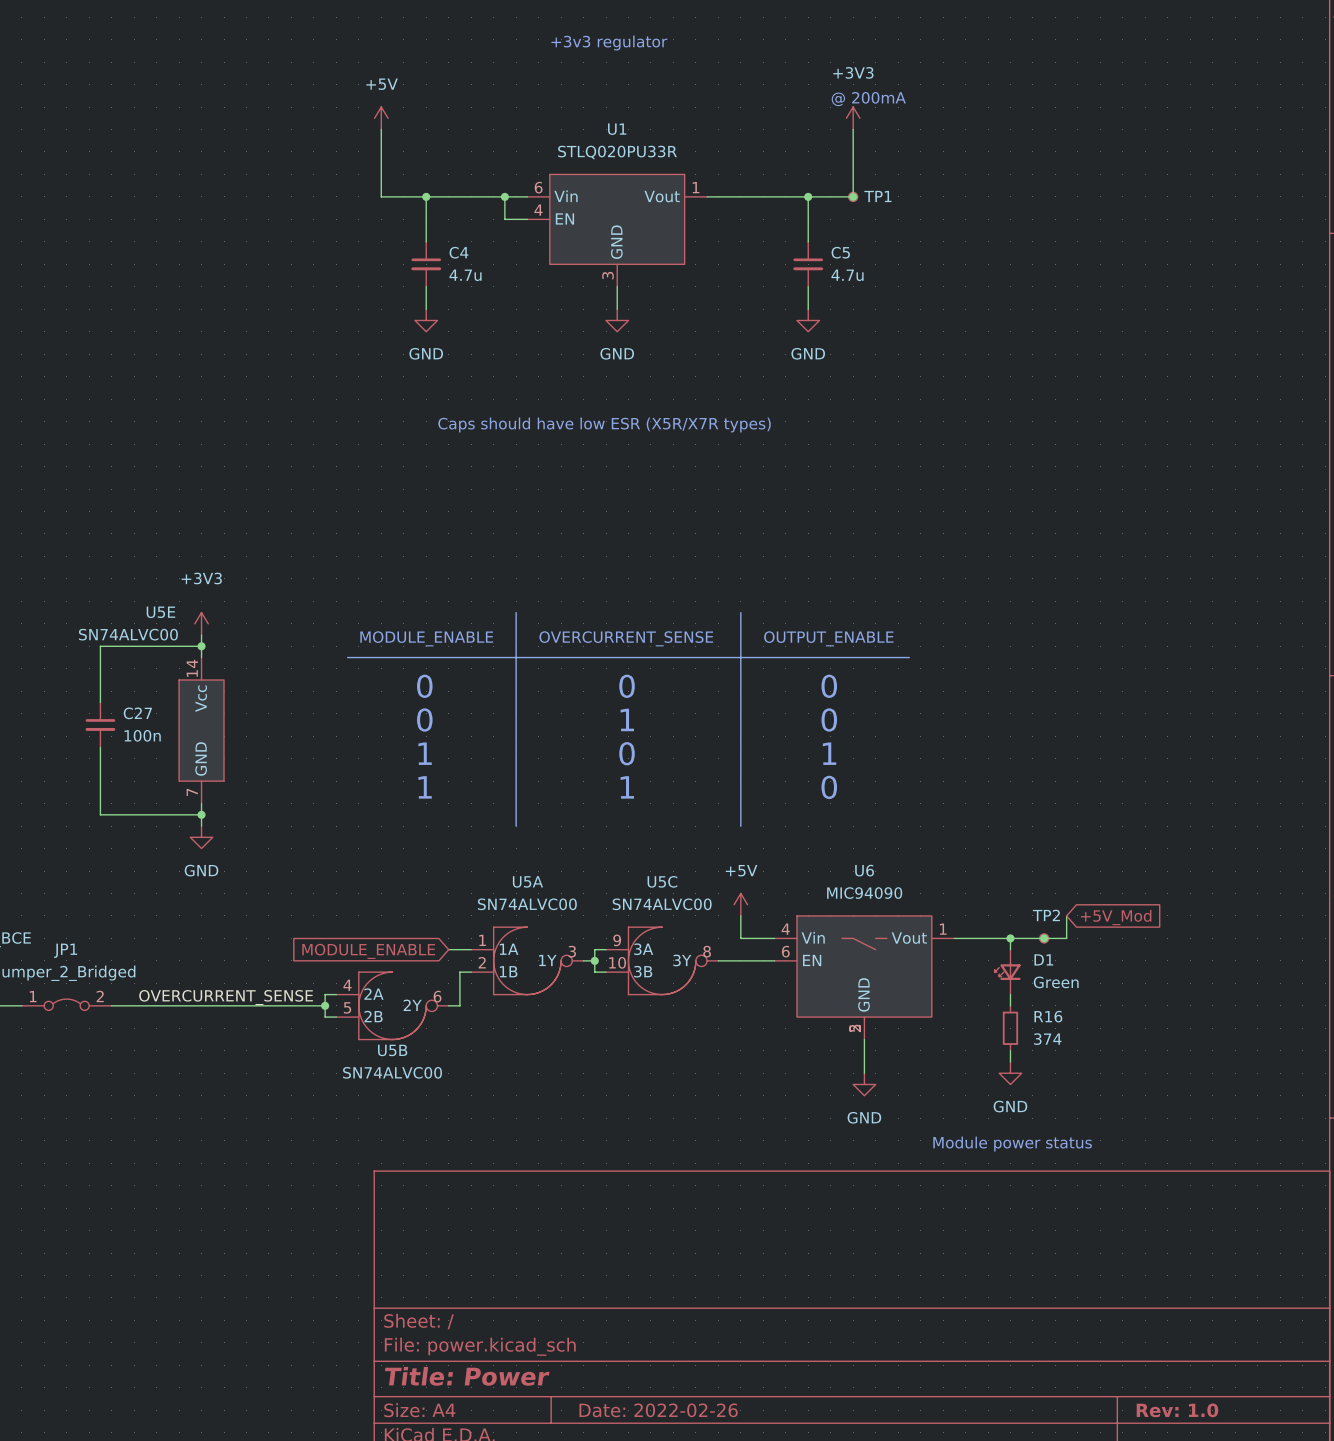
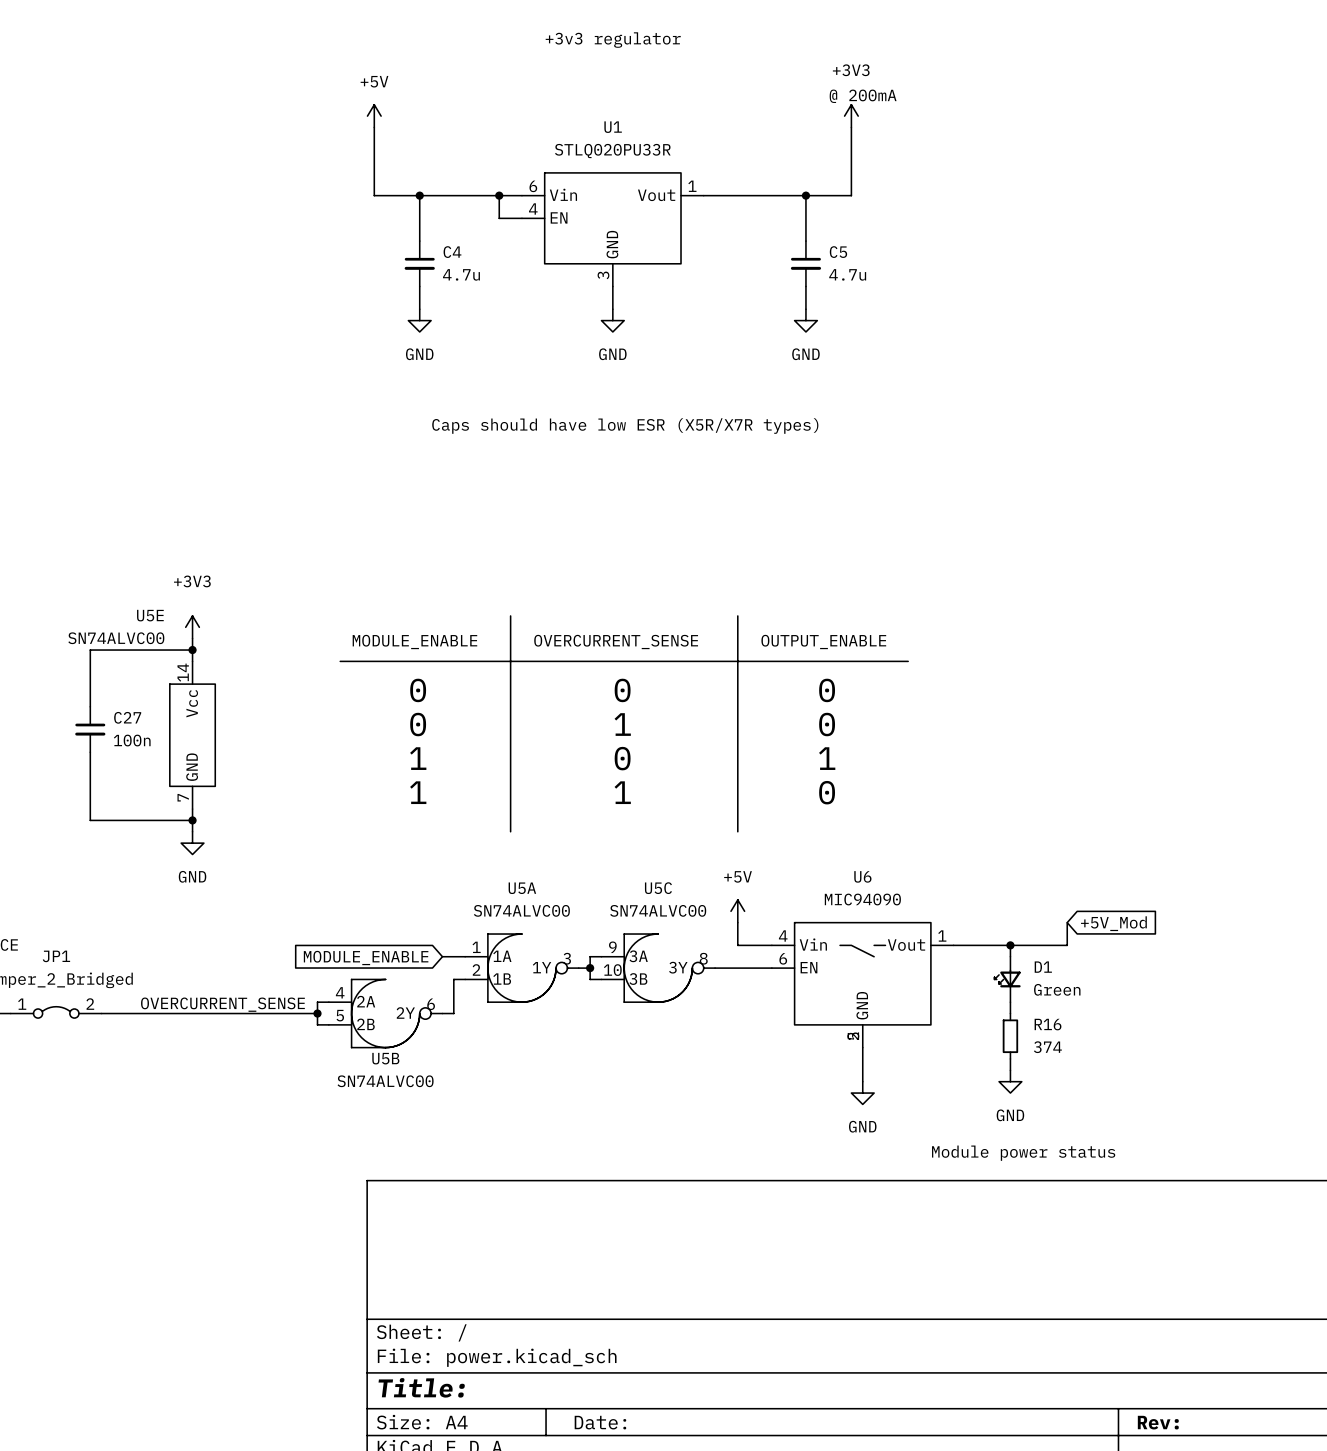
junction: (853, 196) -> none
TP1: (853, 196) -> none
junction: (1044, 938) -> none
TP2: (1044, 938) -> none
title block: Title: Power (467, 1376) -> Title: (421, 1387)
title block: Date: 2022-02-26 (658, 1410) -> Date: (600, 1422)
title block: Rev: 1.0 (1177, 1410) -> Rev: (1158, 1422)

